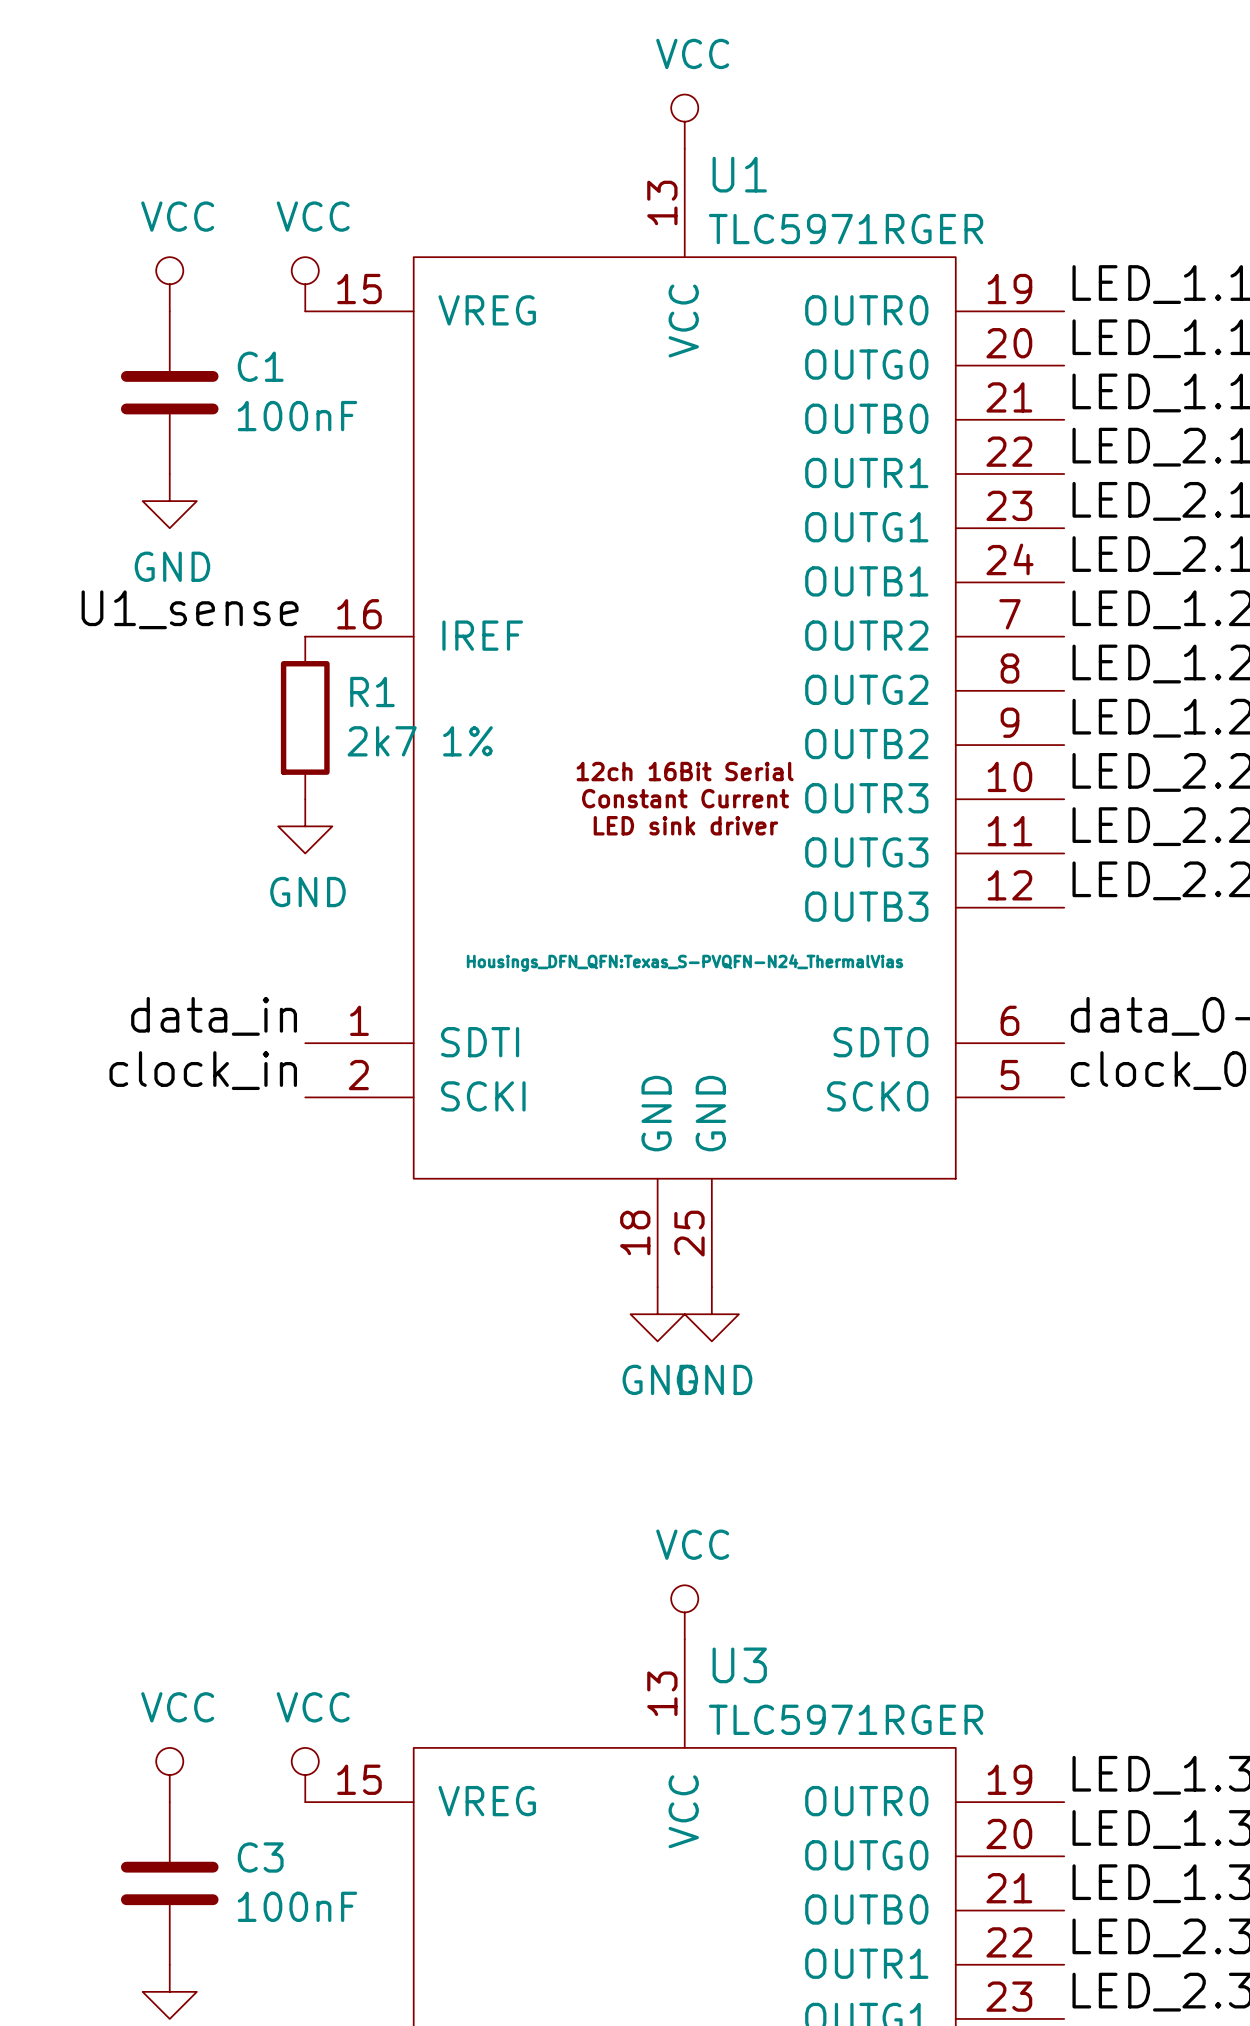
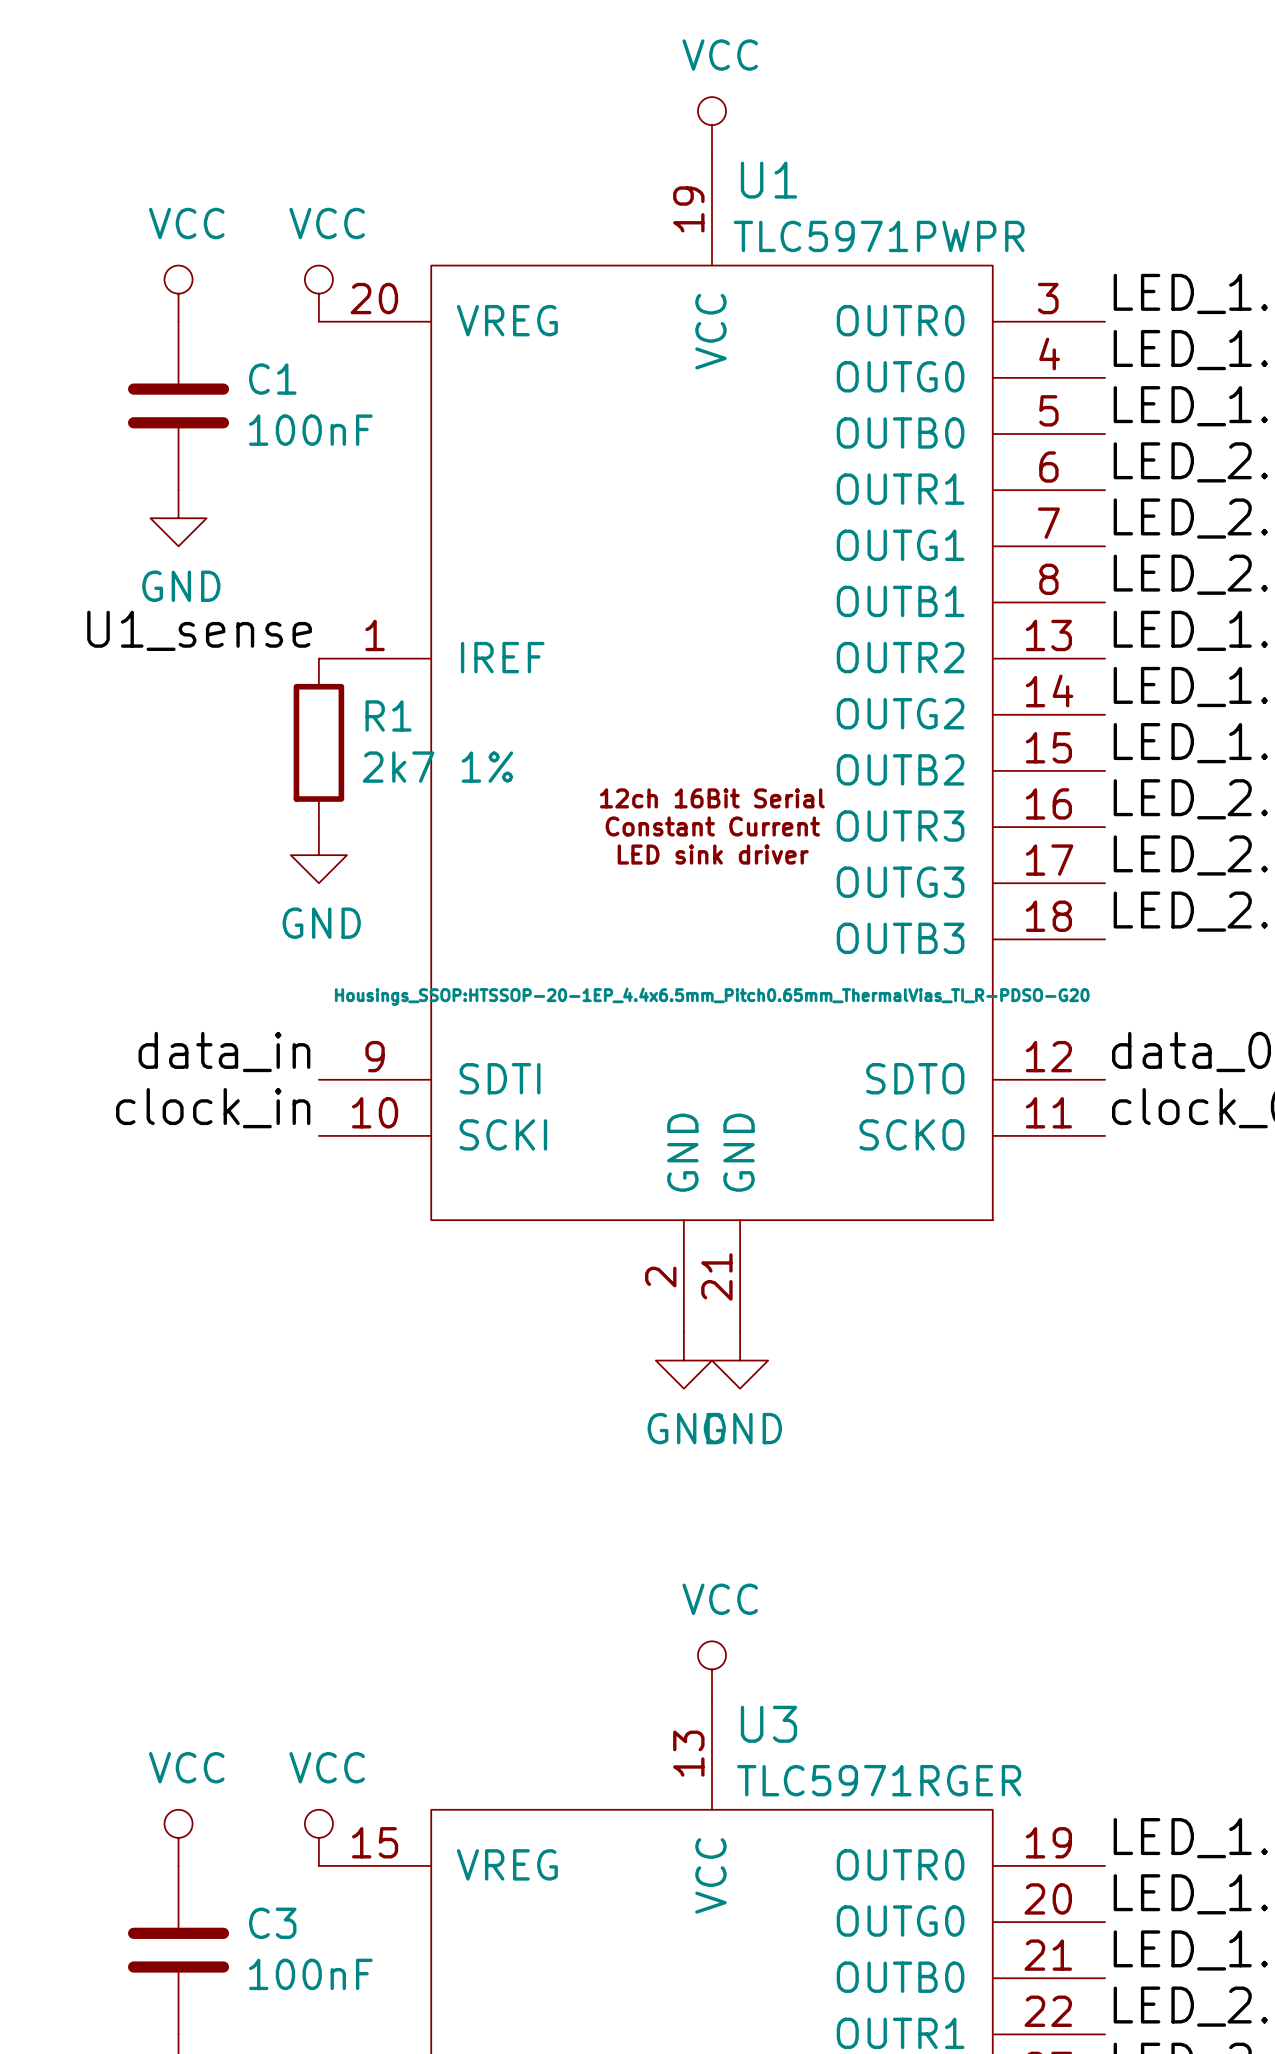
U1 symbol: [305, 148, 1065, 1288] -> [318, 153, 1106, 1333]
U1 value: TLC5971RGER (846, 229) -> TLC5971PWPR (879, 236)
U1 text: Housings_DFN_QFN:Texas_S-PVQFN-N24_ThermalVias (684, 963) -> Housings_SSOP:HTSSOP-20-1EP_4.4x6.5mm_Pitch0.65mm_ThermalVias_TI_R-PDSO-G20 (712, 996)

